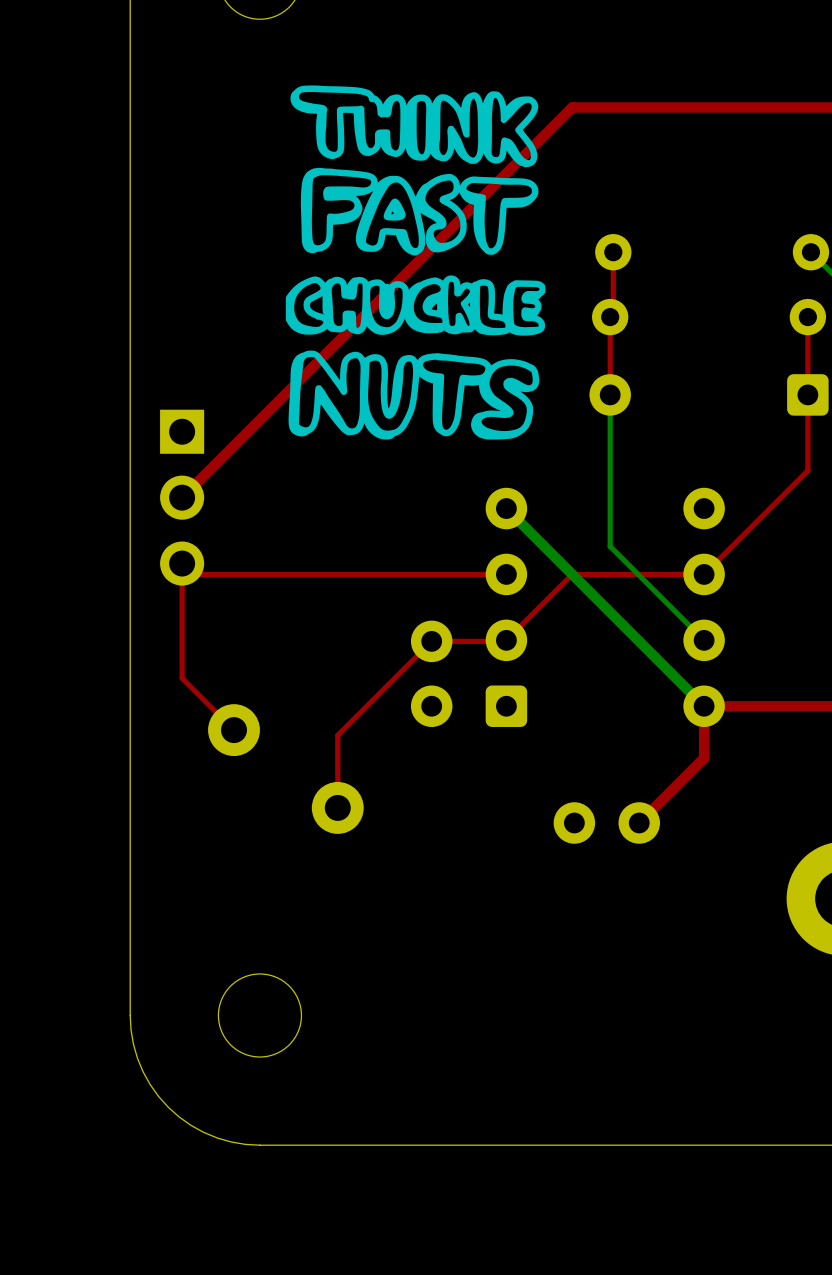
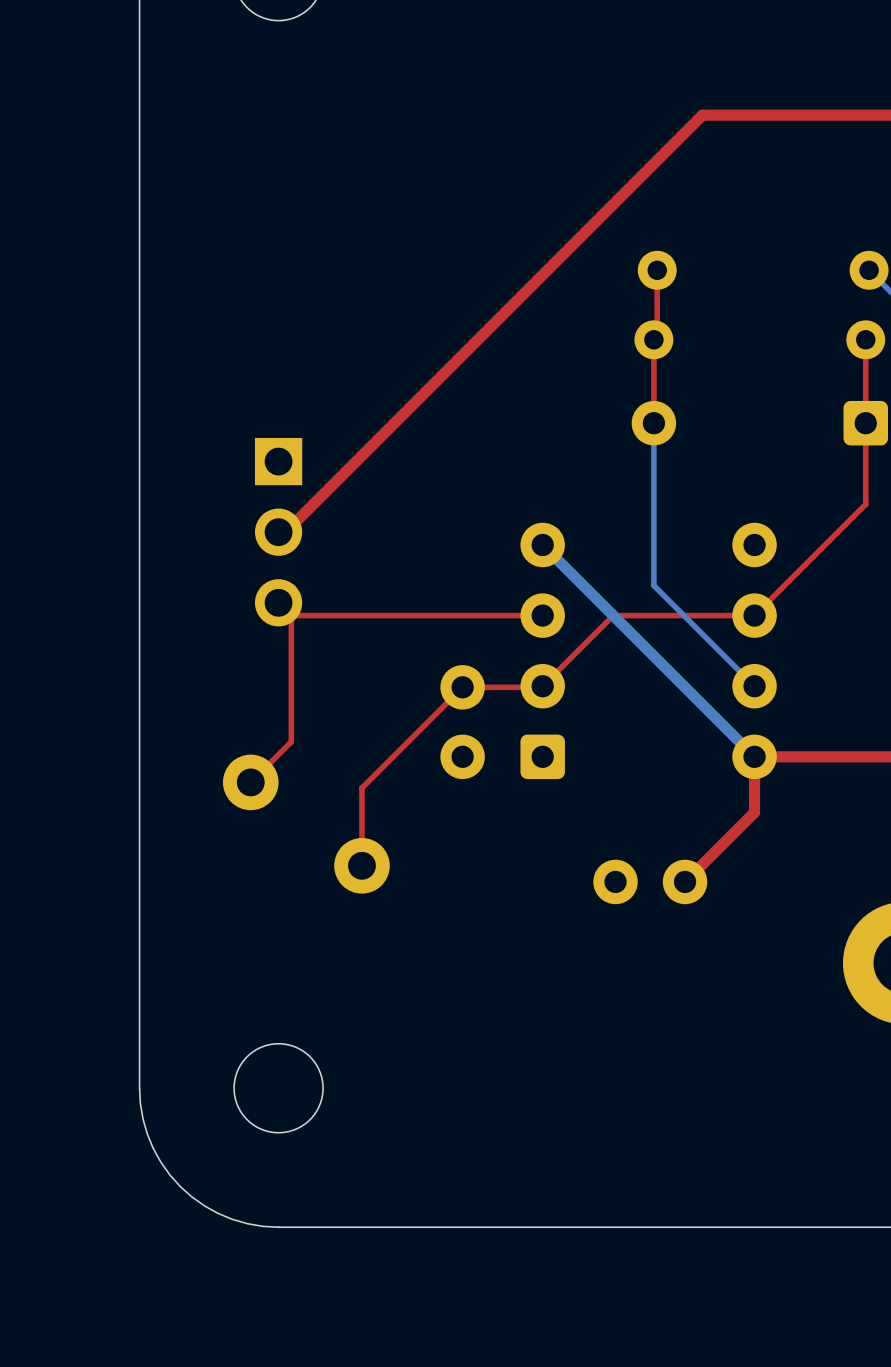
drawing: [285, 85, 546, 440] -> none
top track: (655, 107) (572, 107) (182, 497) -> (702, 115) (285, 532) (278, 532)
part position: (182, 497) -> (278, 532)
top track: (271, 574) (193, 574) (182, 563) (182, 678) (234, 730) -> (278, 602) (291, 615) (291, 741) (250, 782)

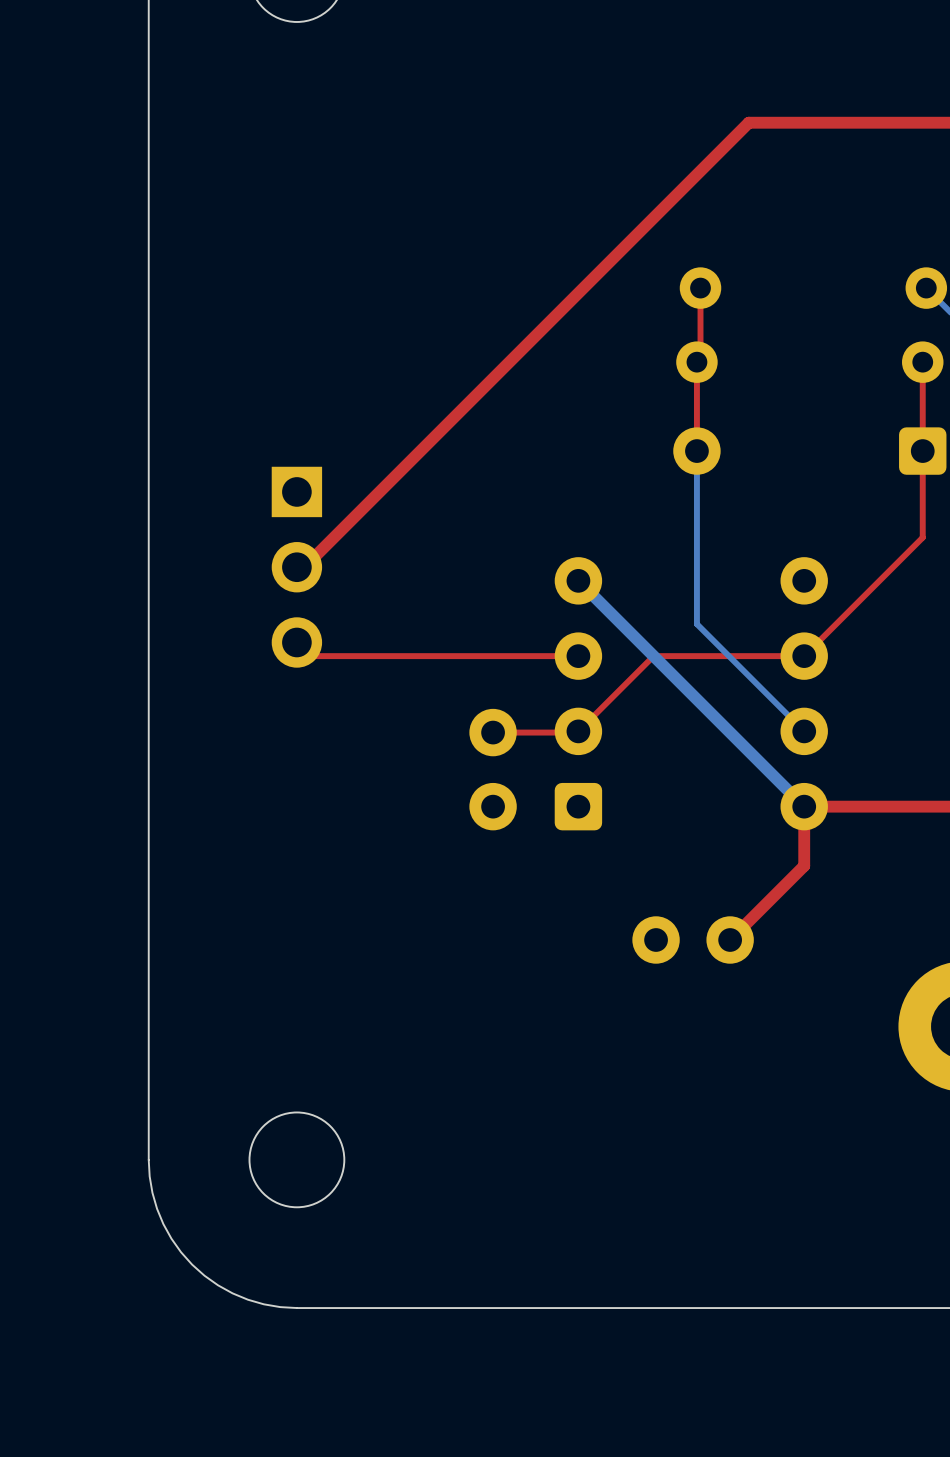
top track: (291, 615) (291, 741) (250, 782) -> none
top track: (462, 687) (361, 787) (361, 865) -> none
part: (250, 782) -> none
part: (361, 865) -> none

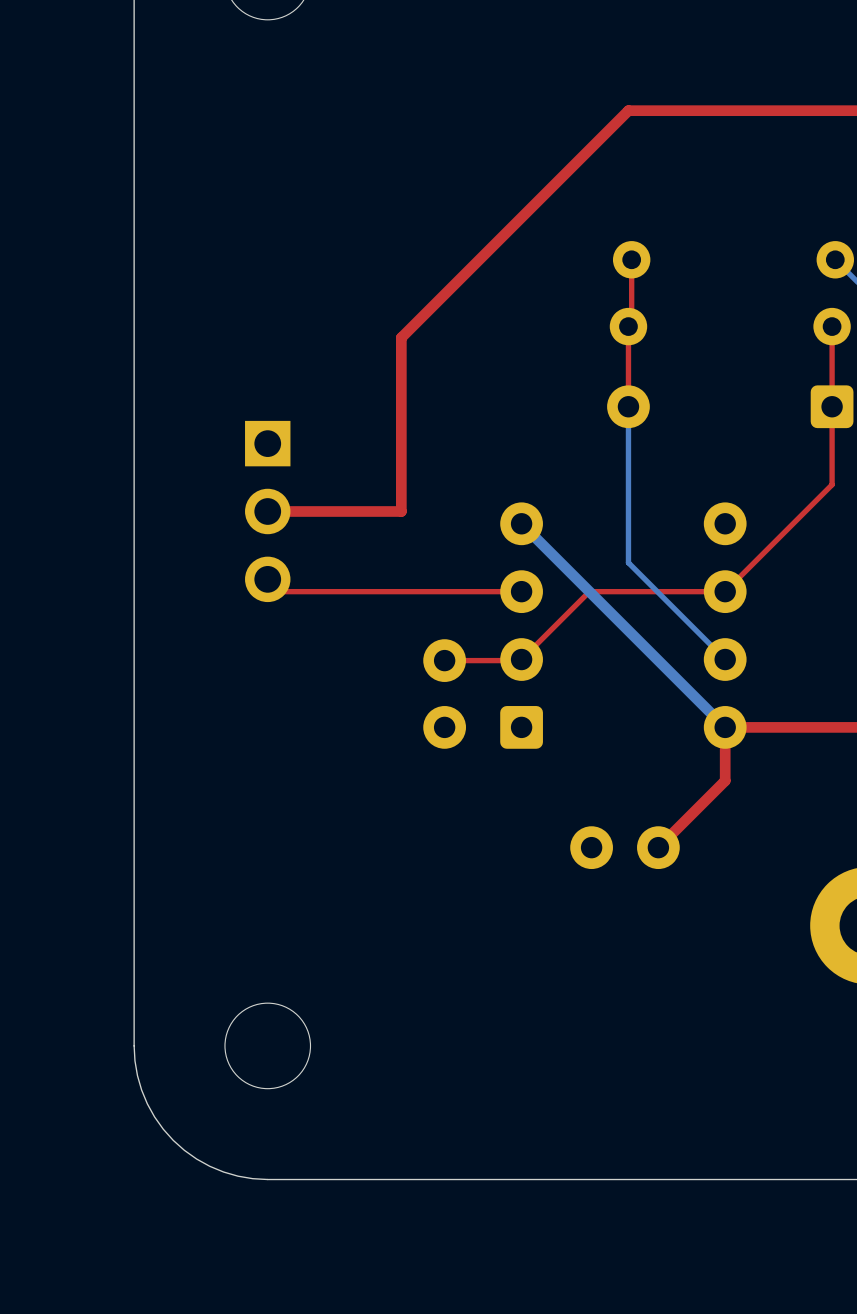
top track: (748, 122) (304, 567) -> (675, 110) (628, 110) (401, 337) (401, 511) (274, 511)

